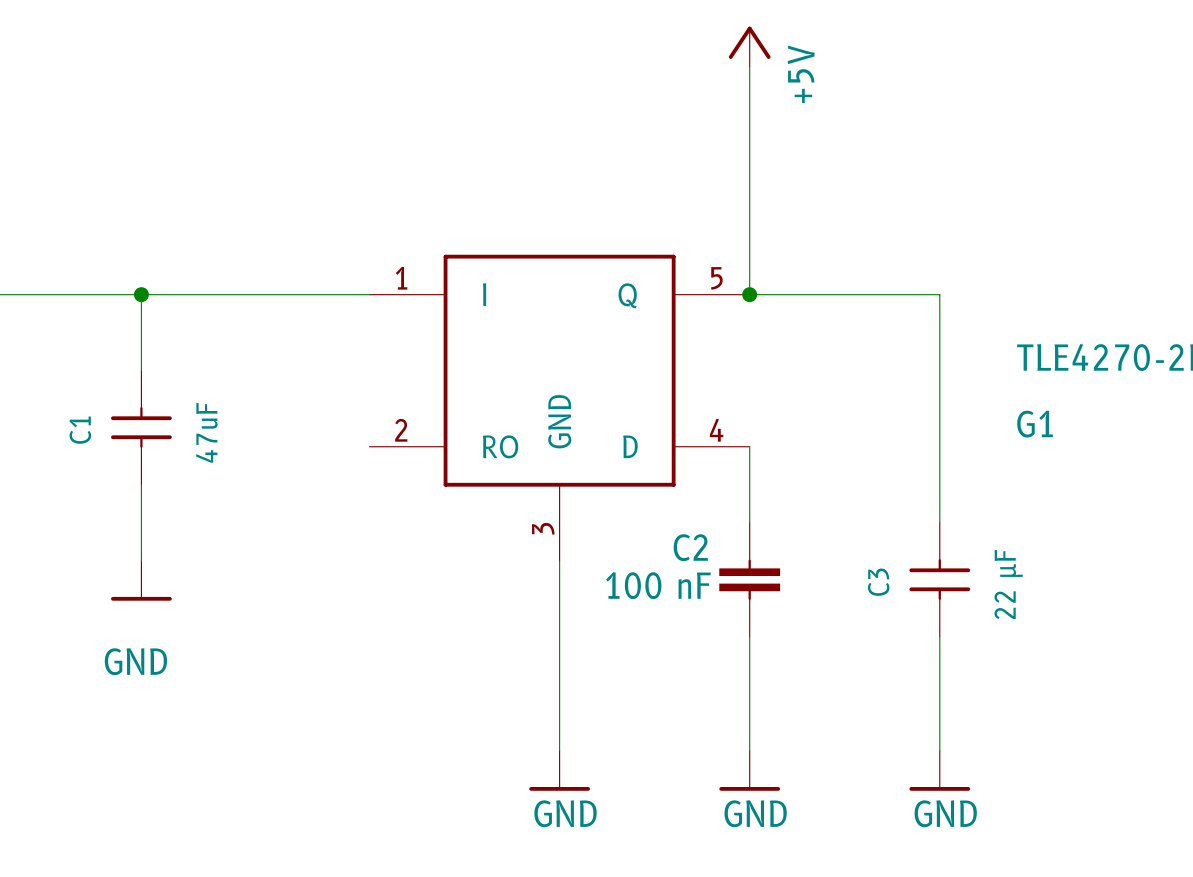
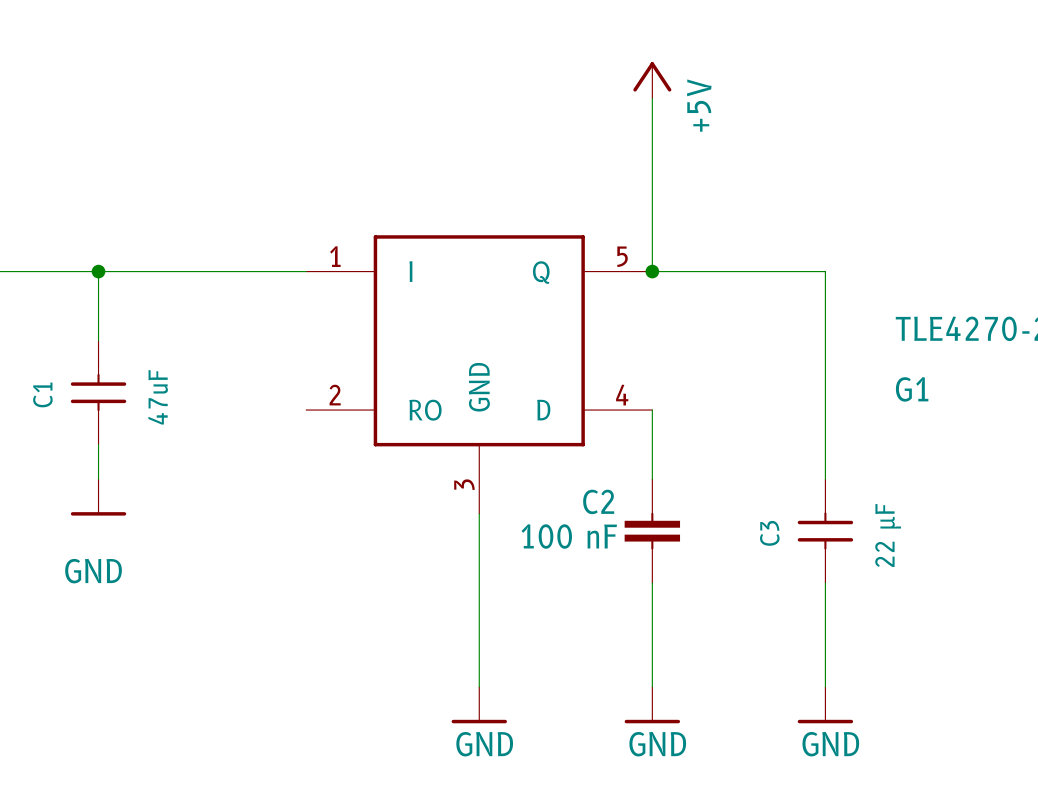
power symbol position: +5V (749, 46) -> +5V (652, 80)
power symbol position: GND (141, 580) -> GND (98, 497)

